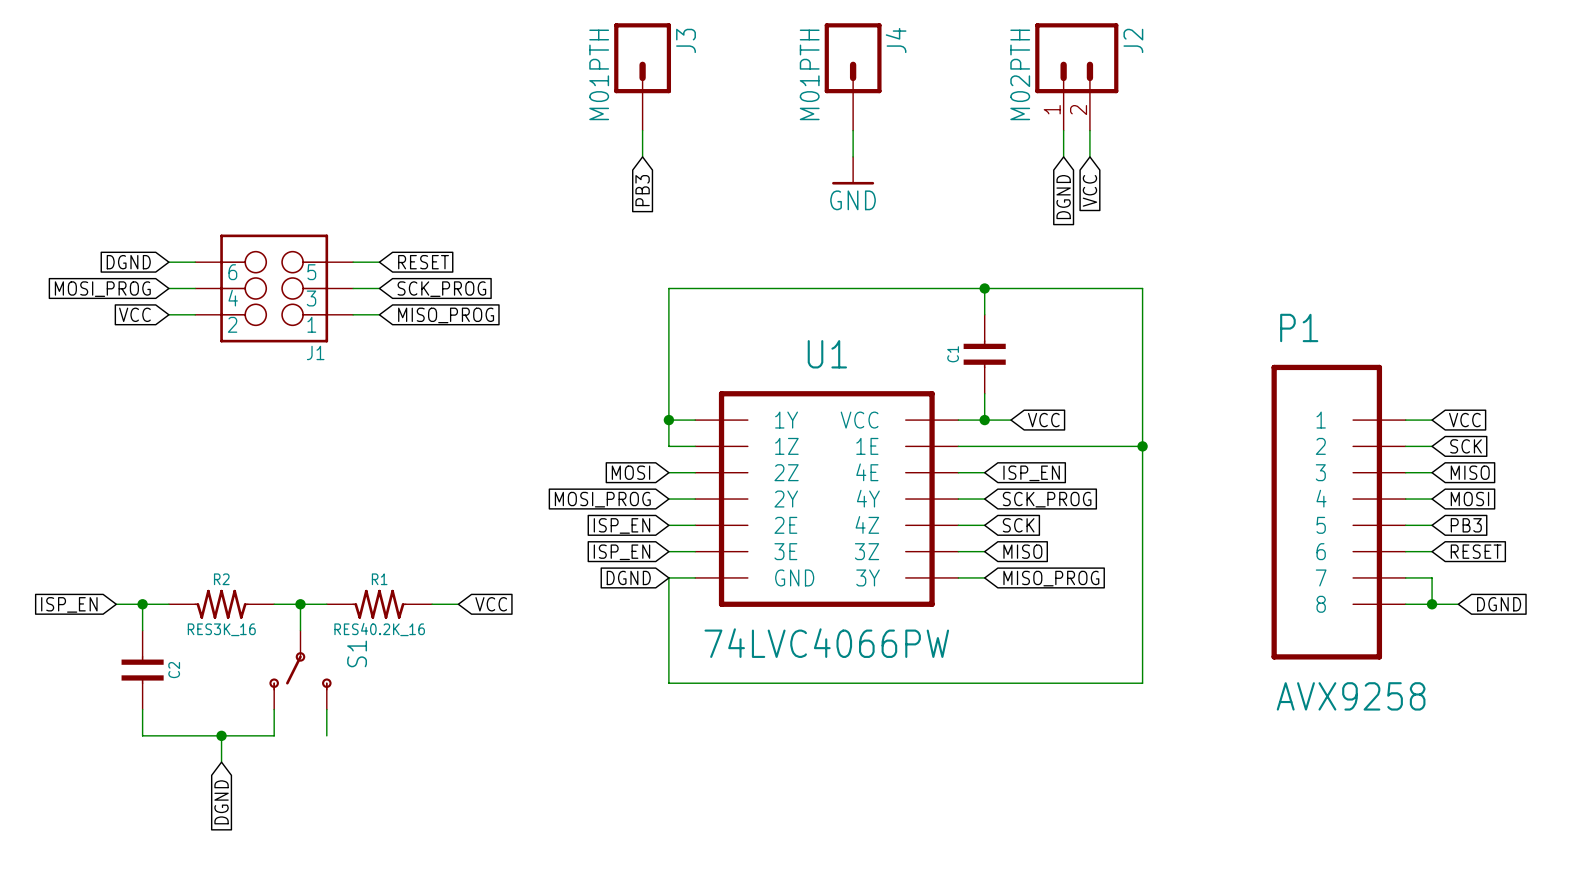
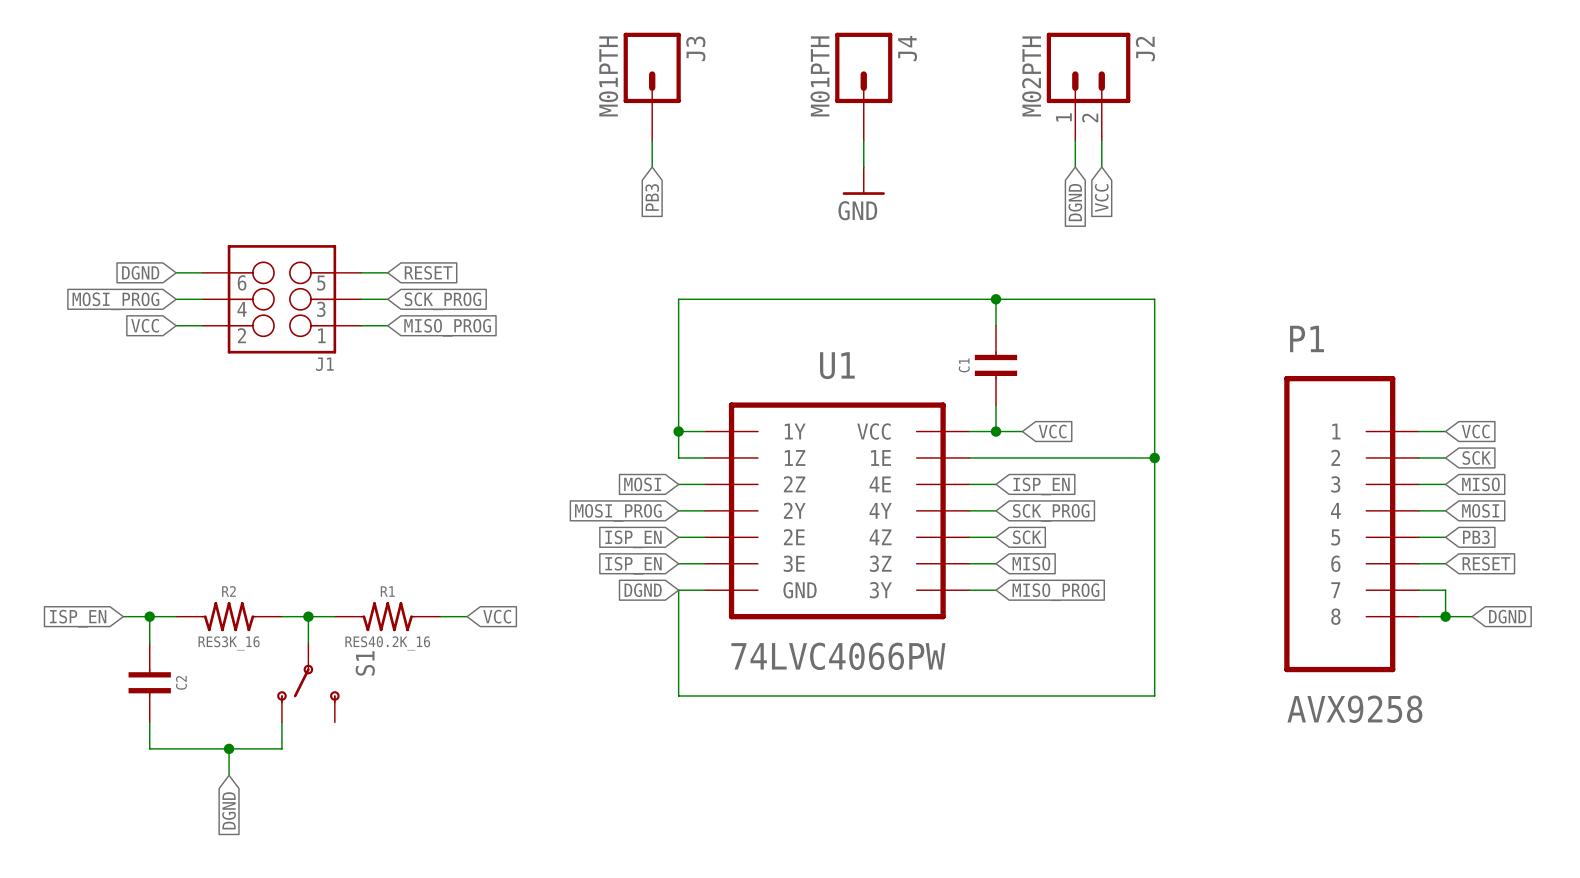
wire: (326, 709) (326, 735) -> none

